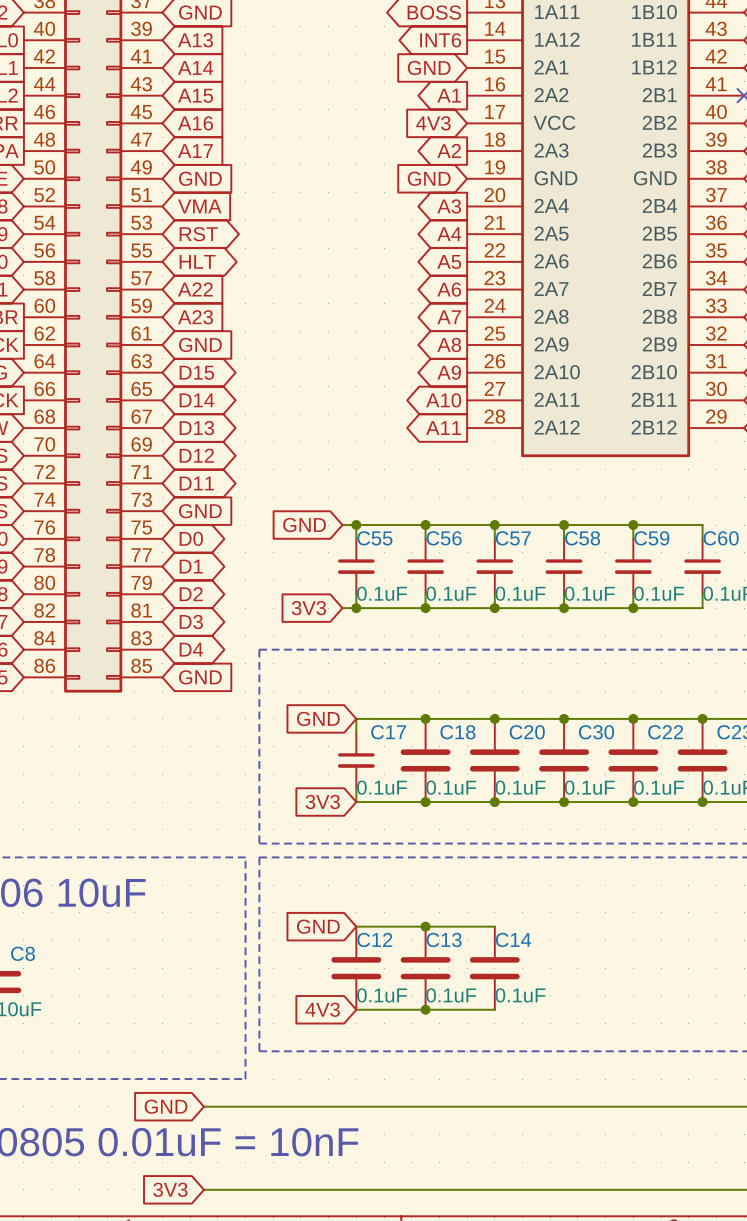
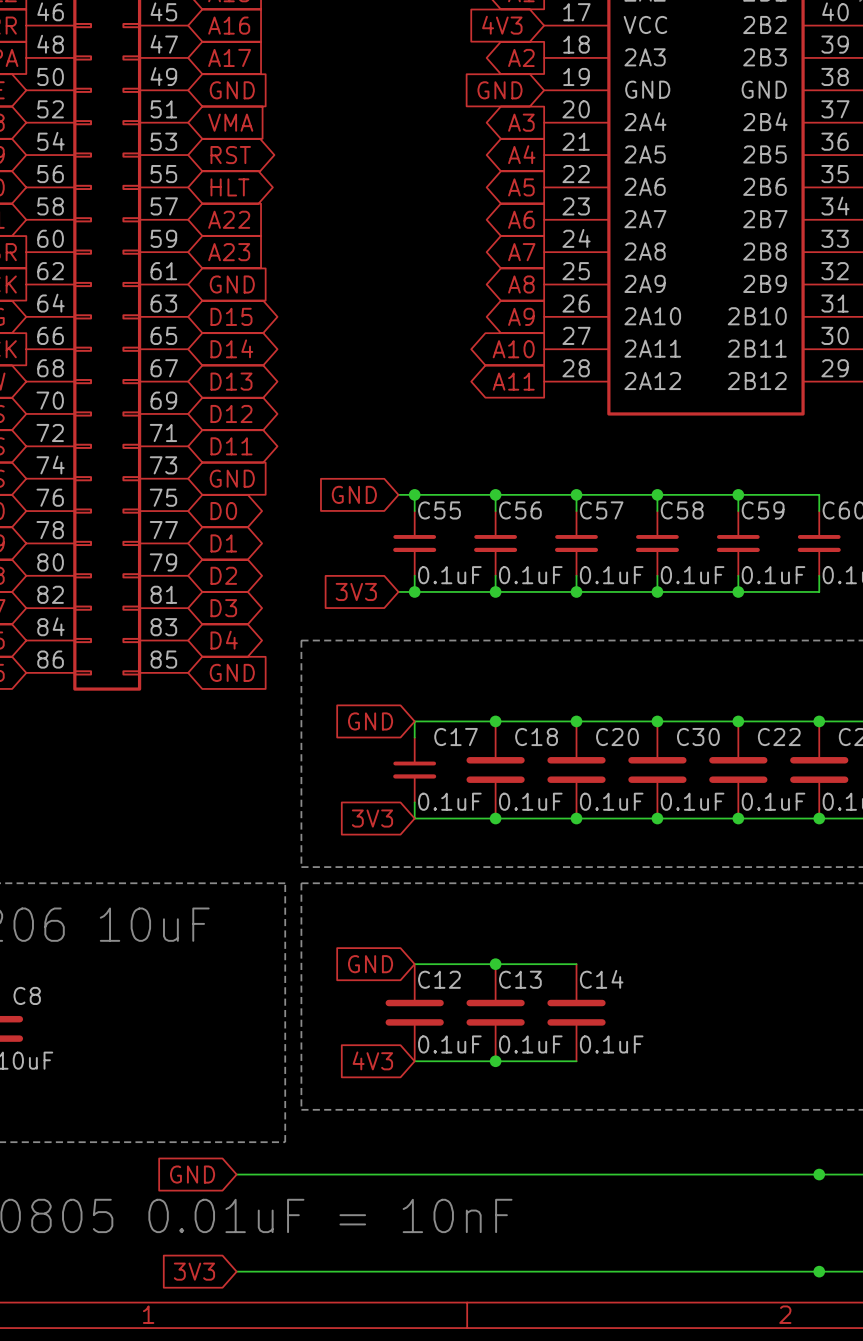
junction: none -> (819, 1174)
junction: none -> (819, 1271)

